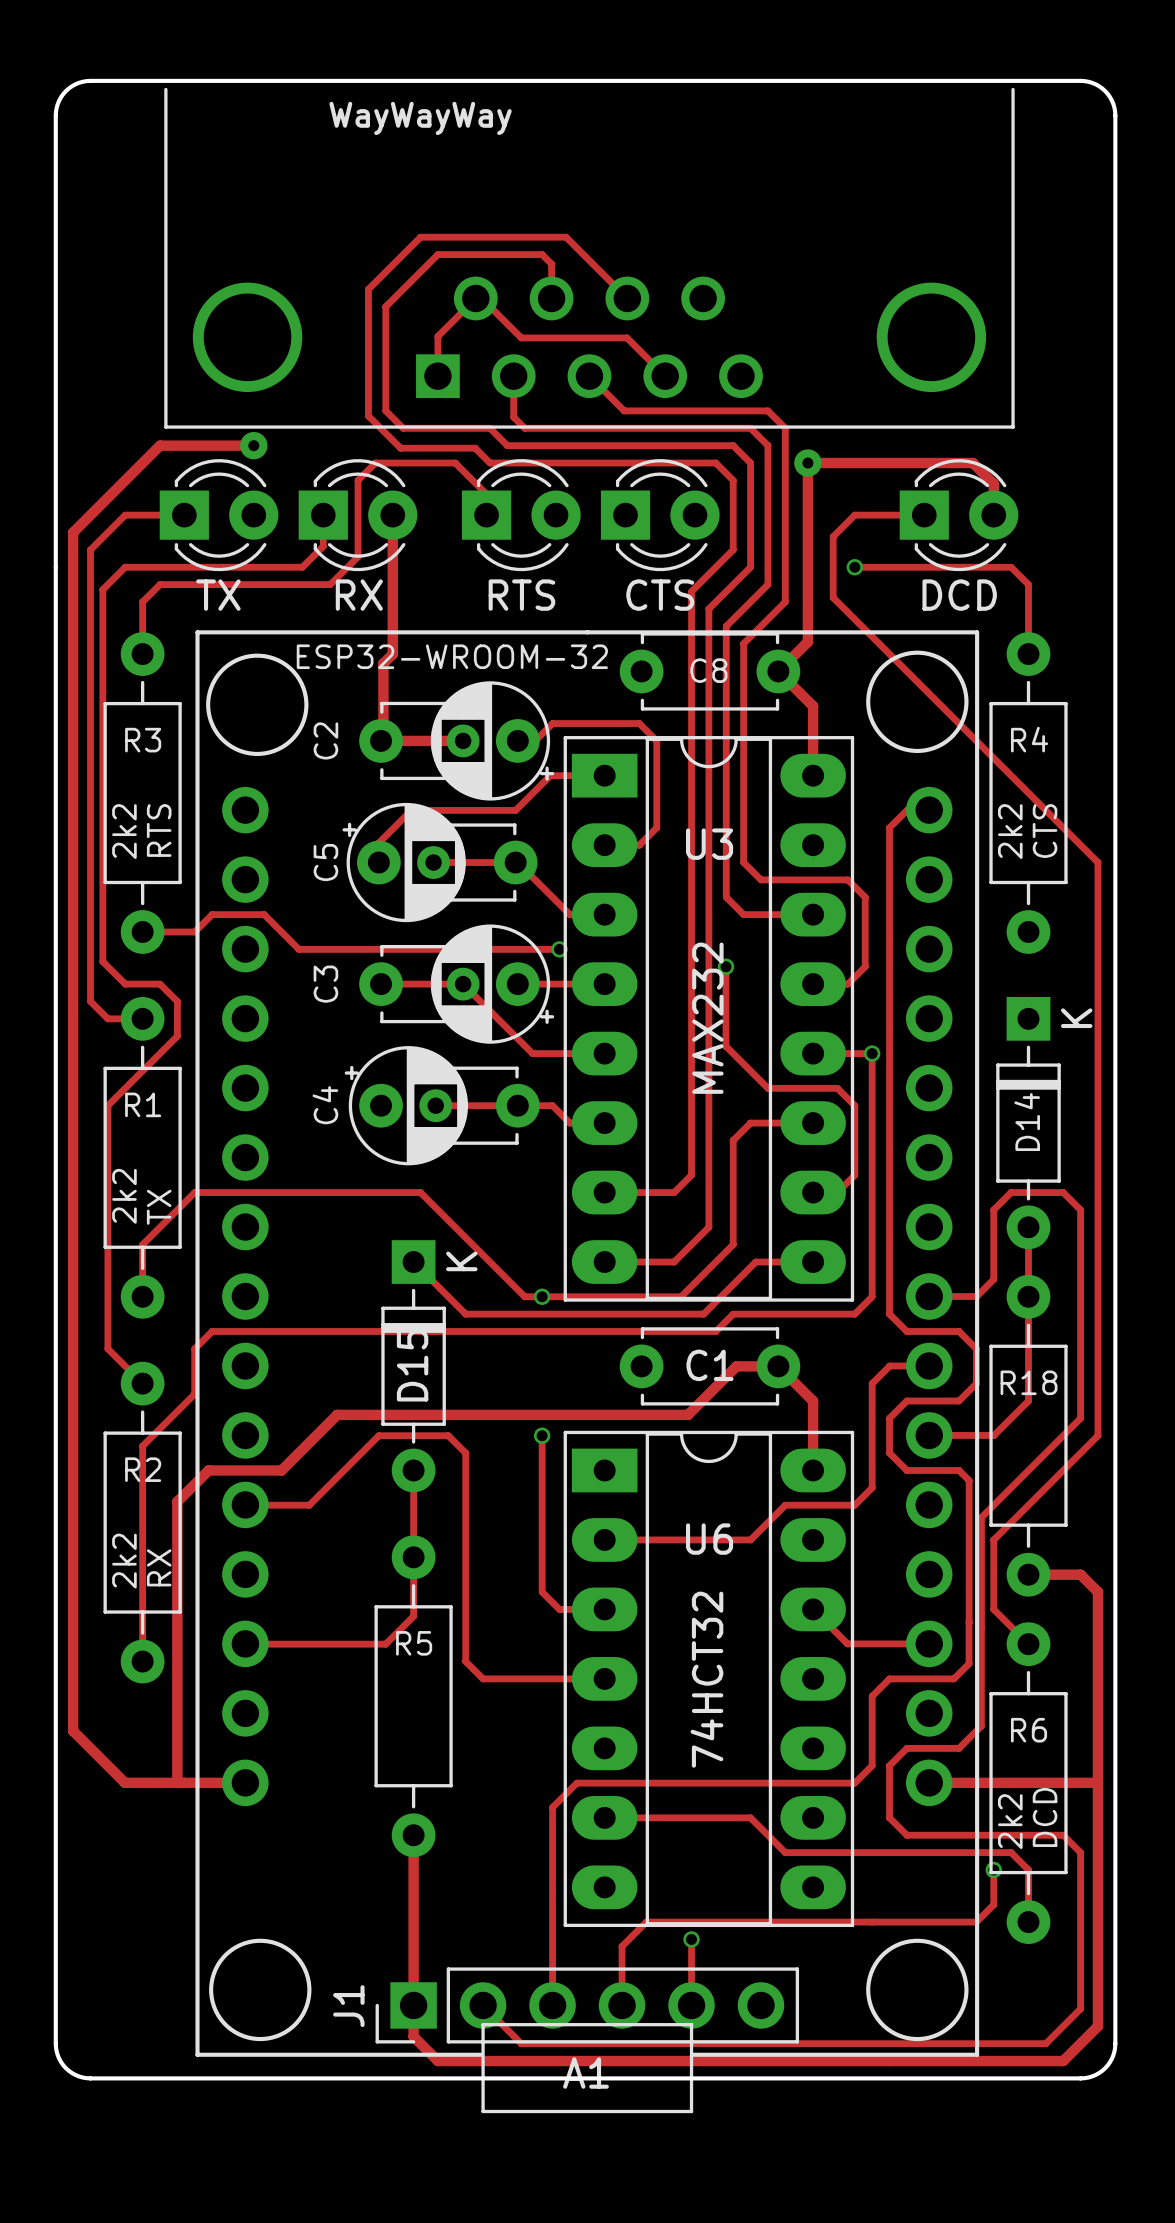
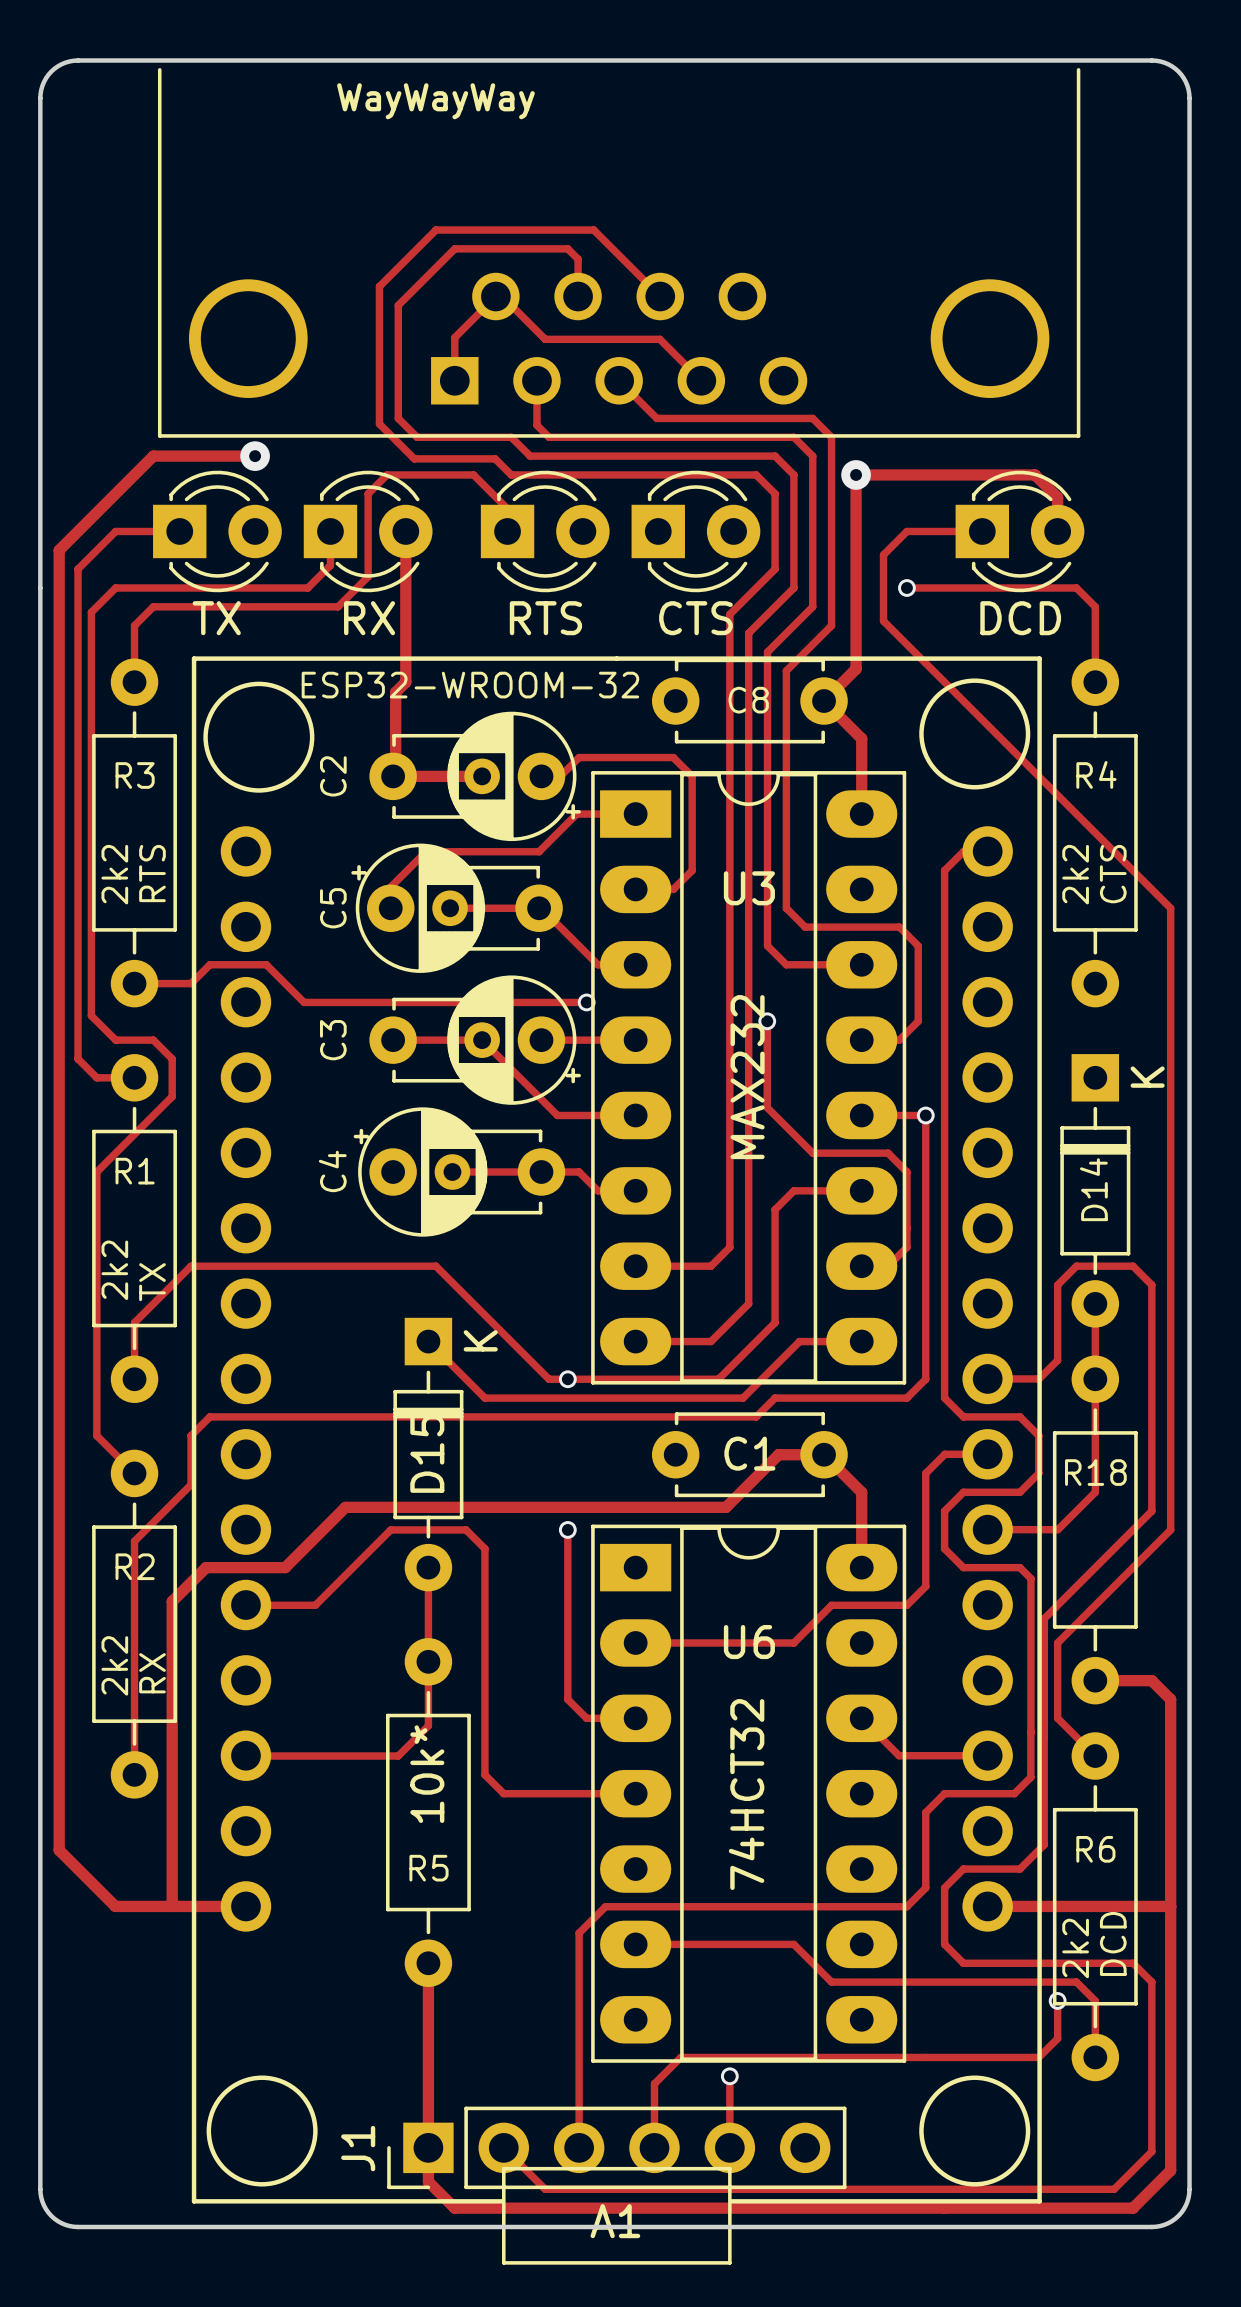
R5 name position: R5 (414, 1643) -> R5 (428, 1868)
R5 value: none -> 10k* (427, 1774)

